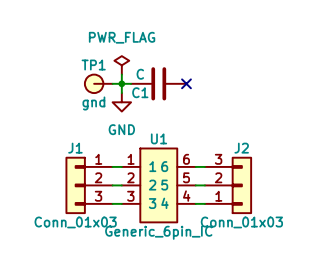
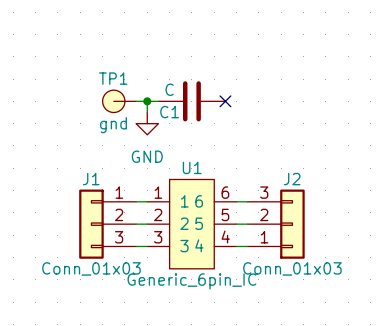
power symbol: PWR_FLAG (121, 65) -> none
wire: (121, 74) (121, 83) -> none

